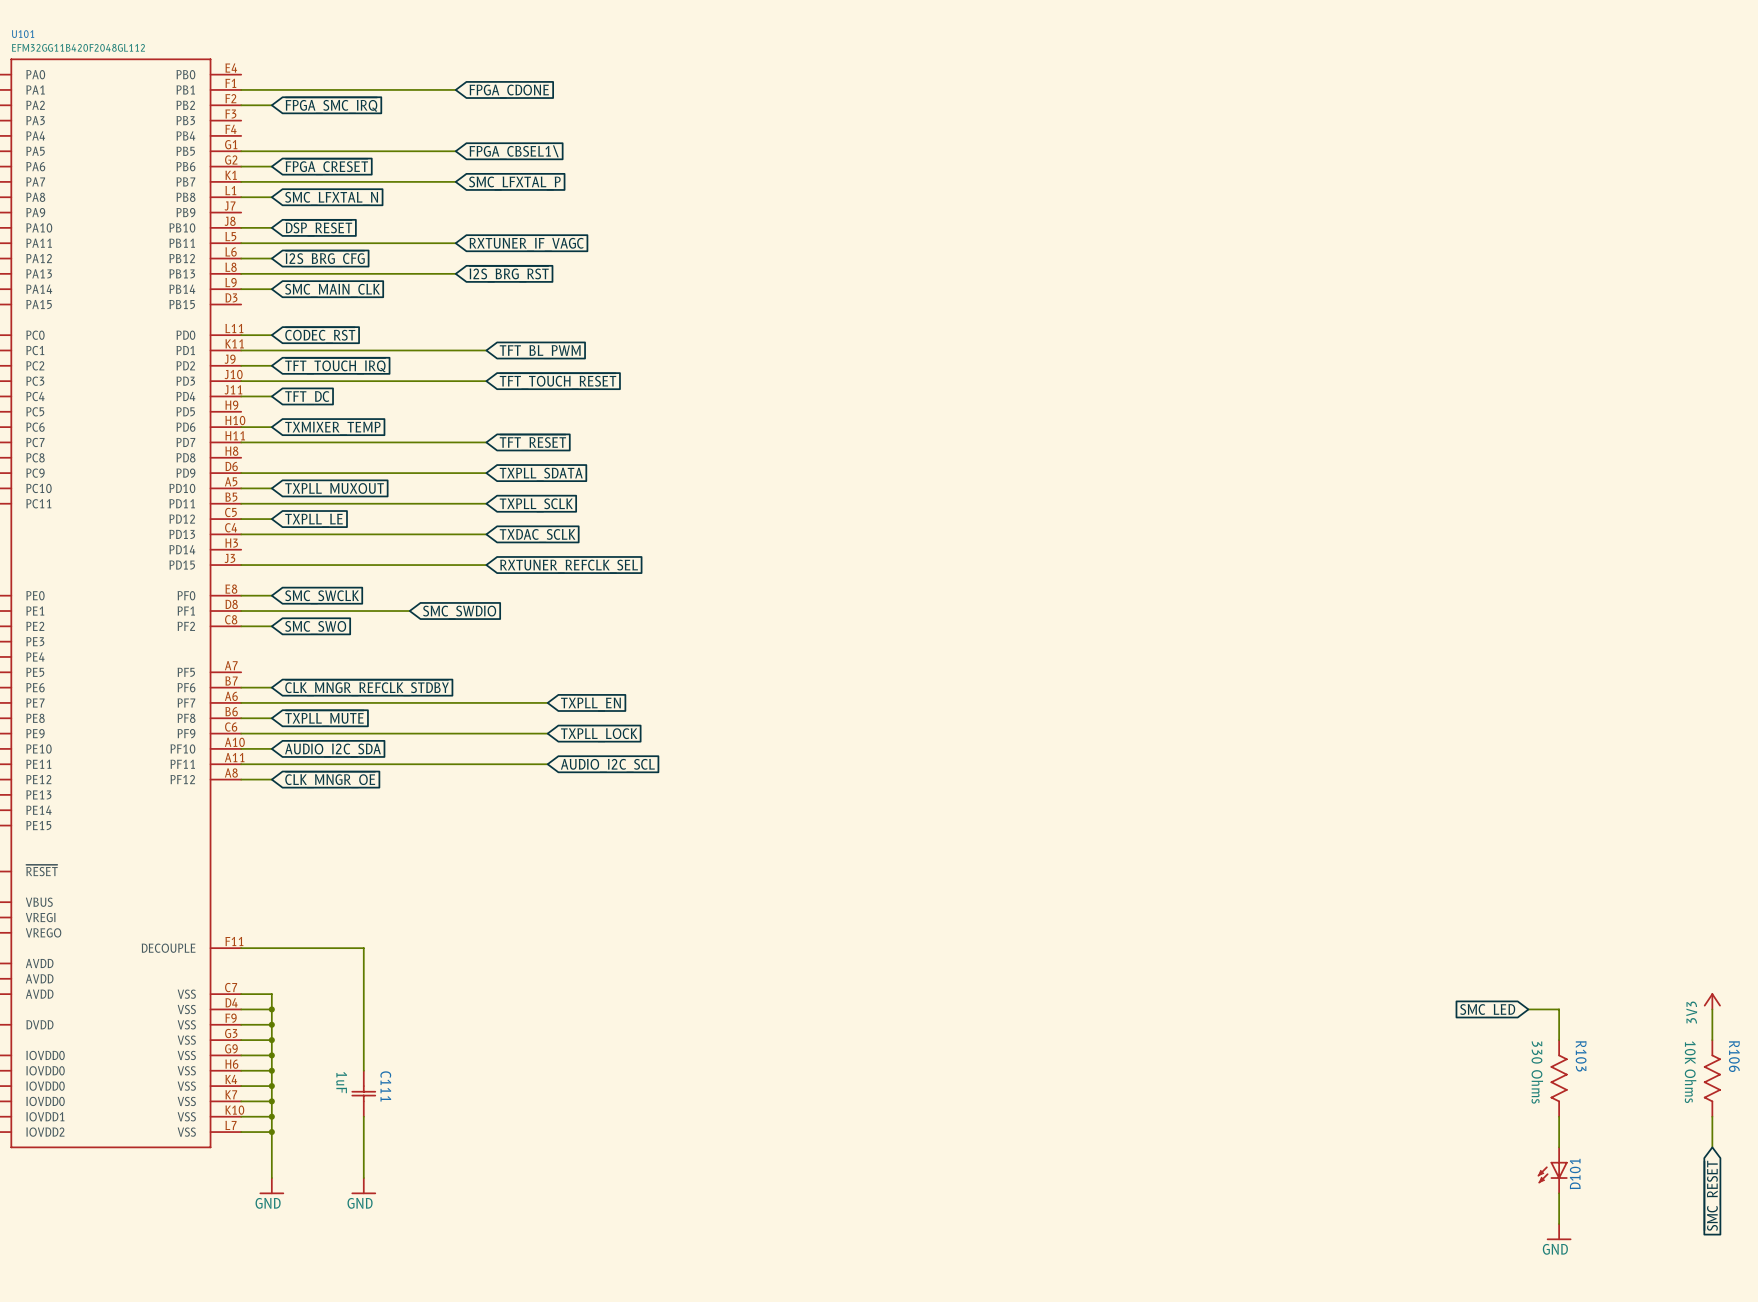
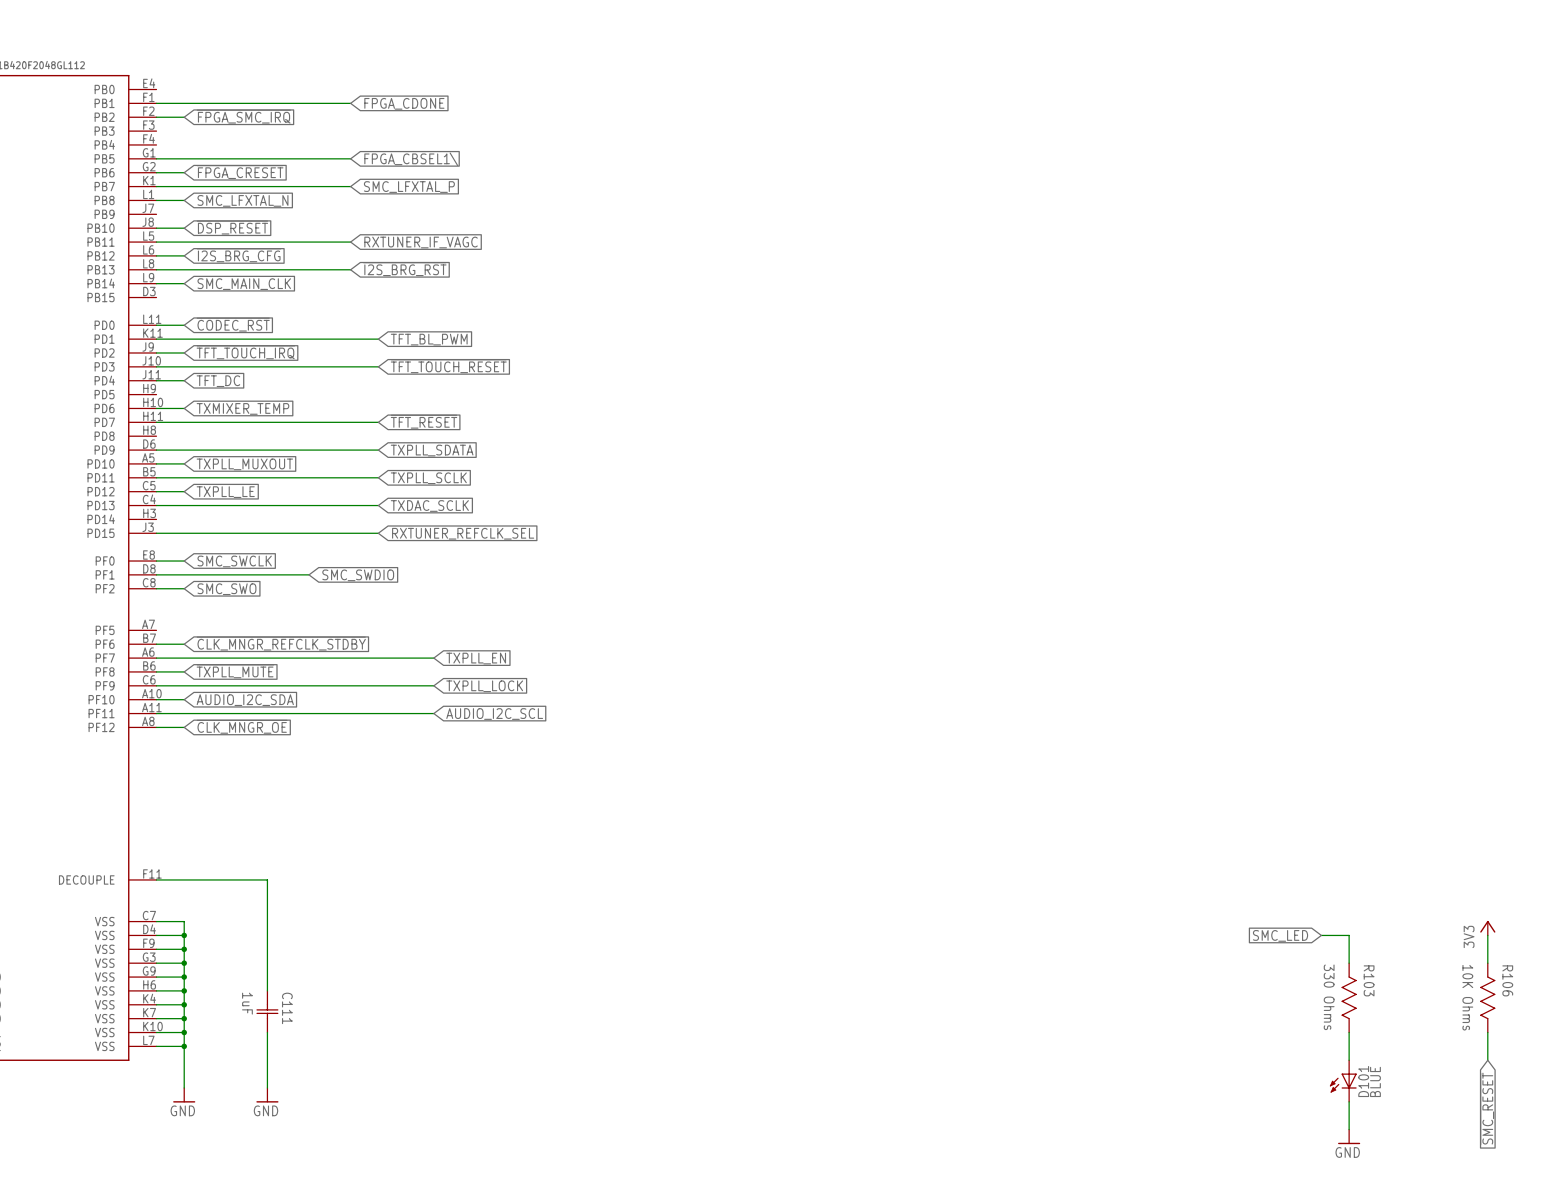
D101 text: none -> BLUE (1375, 1081)

